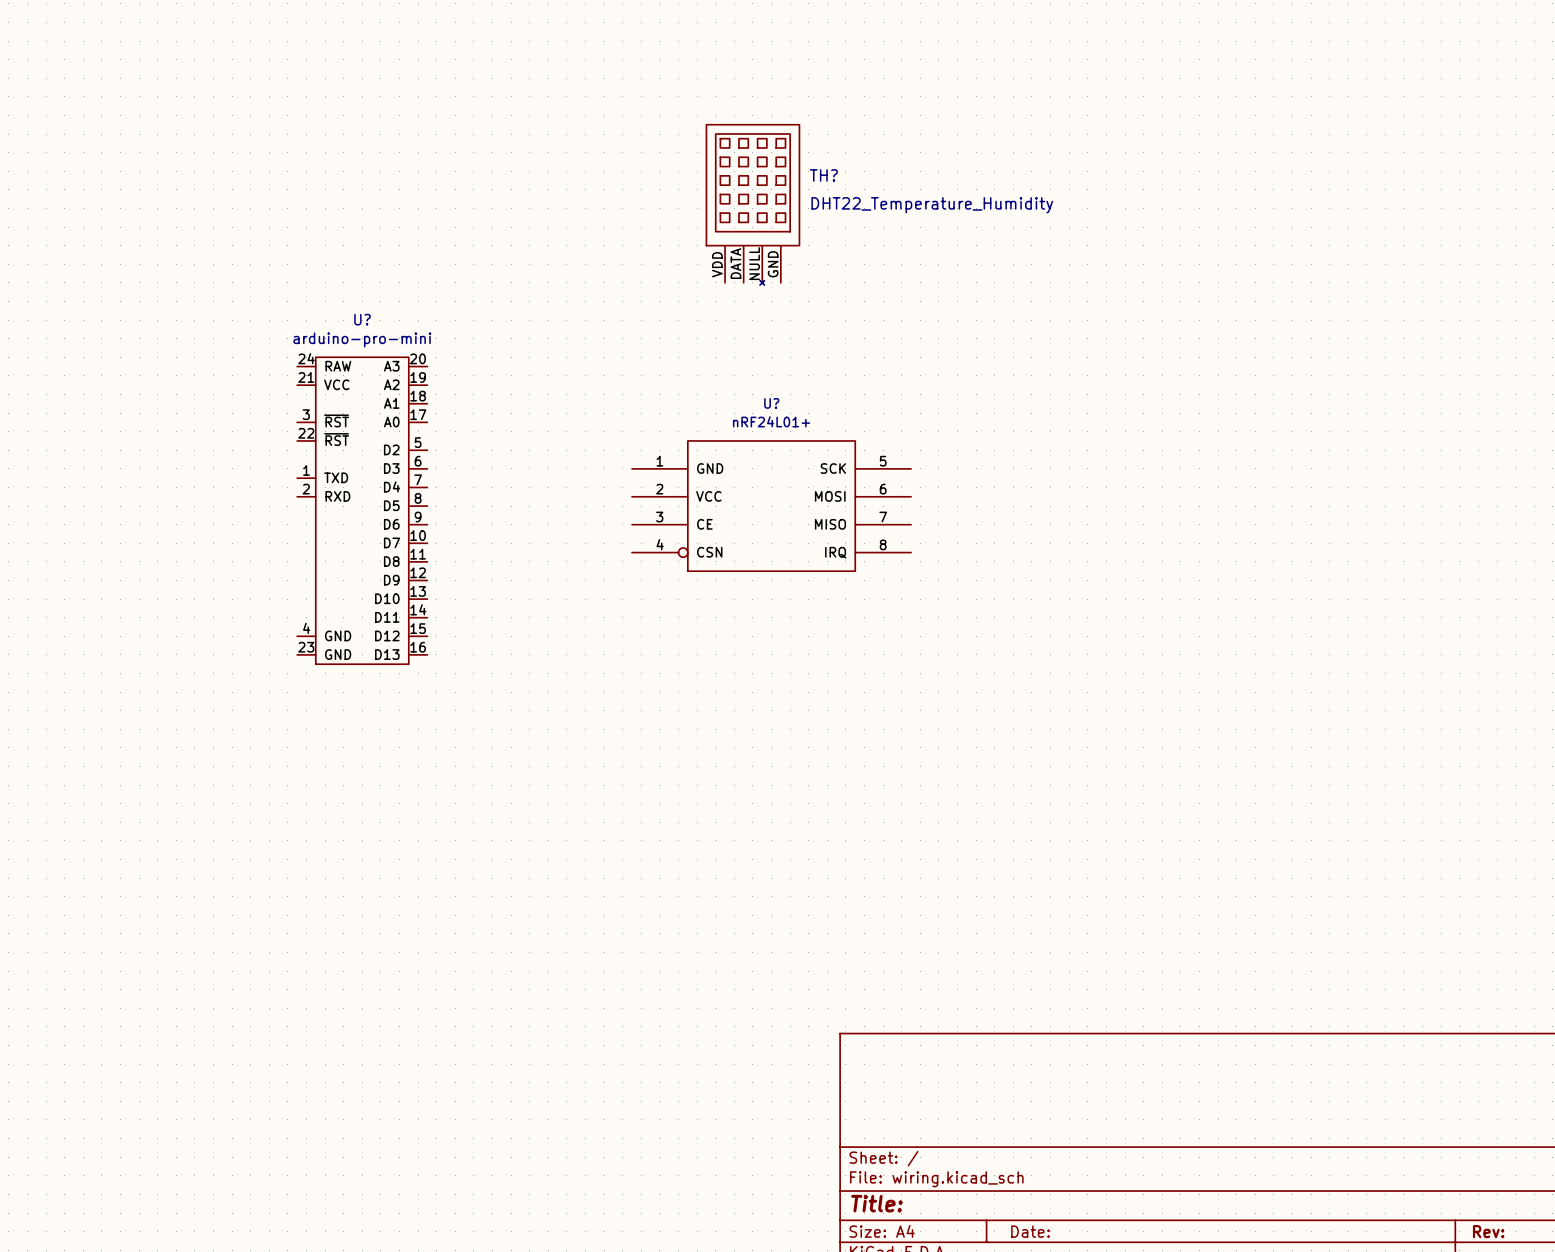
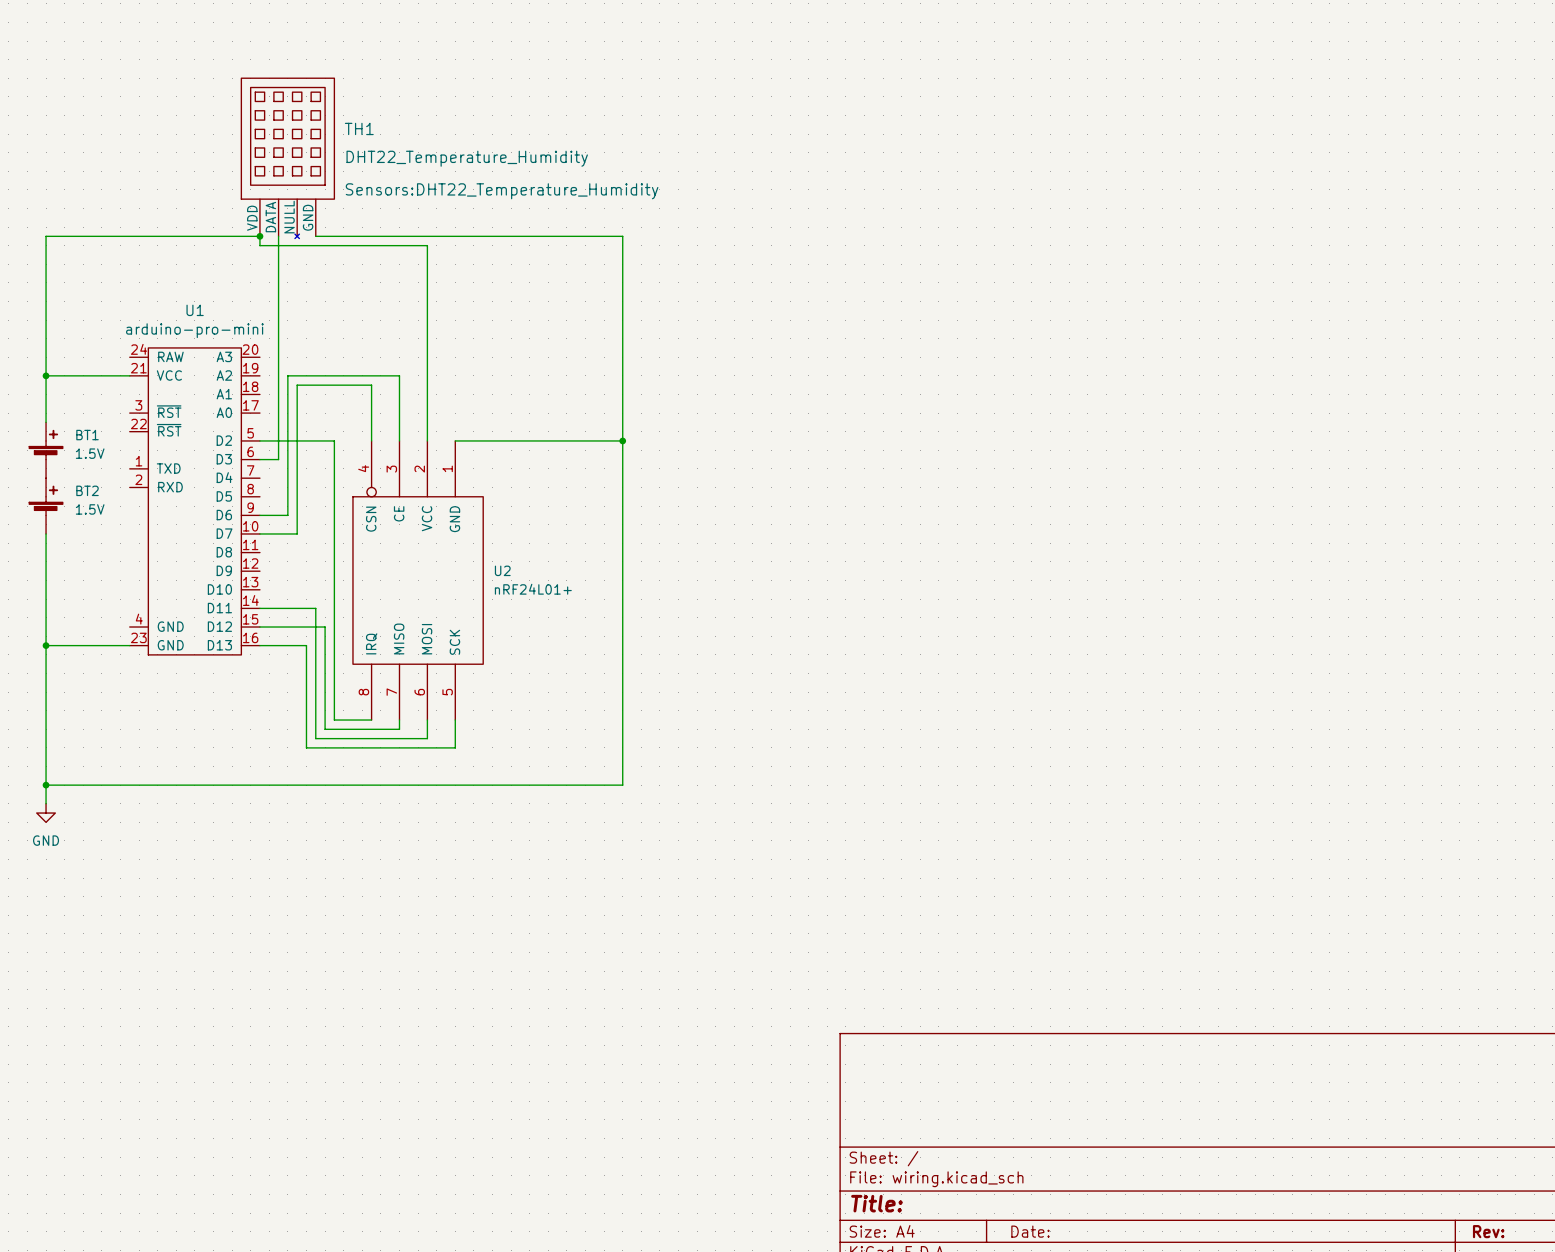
TH1: none -> DHT22_Temperature_Humidity (287, 158)
TH?: DHT22_Temperature_Humidity (752, 204) -> none
junction: none -> (259, 236)
wire: none -> (278, 236) (278, 459) (259, 459)
wire: none -> (315, 236) (622, 236) (622, 785) (46, 785)
wire: none -> (46, 375) (129, 375)
junction: none -> (46, 375)
wire: none -> (46, 422) (46, 236) (259, 236) (259, 245) (427, 245) (427, 440)
wire: none -> (259, 440) (334, 440) (334, 720) (371, 720)
wire: none -> (371, 440) (371, 385) (297, 385) (297, 533) (259, 533)
wire: none -> (399, 440) (399, 375) (287, 375) (287, 515) (259, 515)
wire: none -> (455, 440) (622, 440)
junction: none -> (622, 440)
BT1: none -> 1.5V (46, 450)
U1: none -> arduino-pro-mini (194, 501)
BT2: none -> 1.5V (46, 506)
U?: nRF24L01+ (771, 506) -> none
U?: arduino-pro-mini (362, 510) -> none
wire: none -> (46, 533) (46, 803)
U2: none -> nRF24L01+ (418, 580)
wire: none -> (259, 608) (315, 608) (315, 738) (427, 738) (427, 720)
wire: none -> (259, 627) (325, 627) (325, 729) (399, 729) (399, 720)
wire: none -> (46, 645) (129, 645)
junction: none -> (46, 645)
wire: none -> (259, 645) (306, 645) (306, 747) (455, 747) (455, 720)
junction: none -> (46, 785)
power symbol: none -> GND (46, 813)

